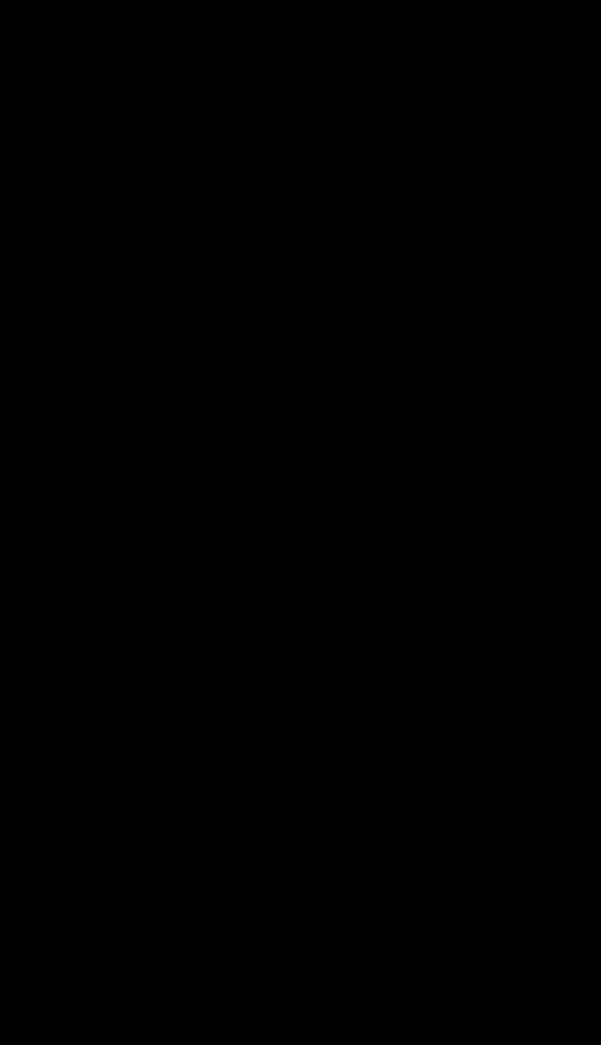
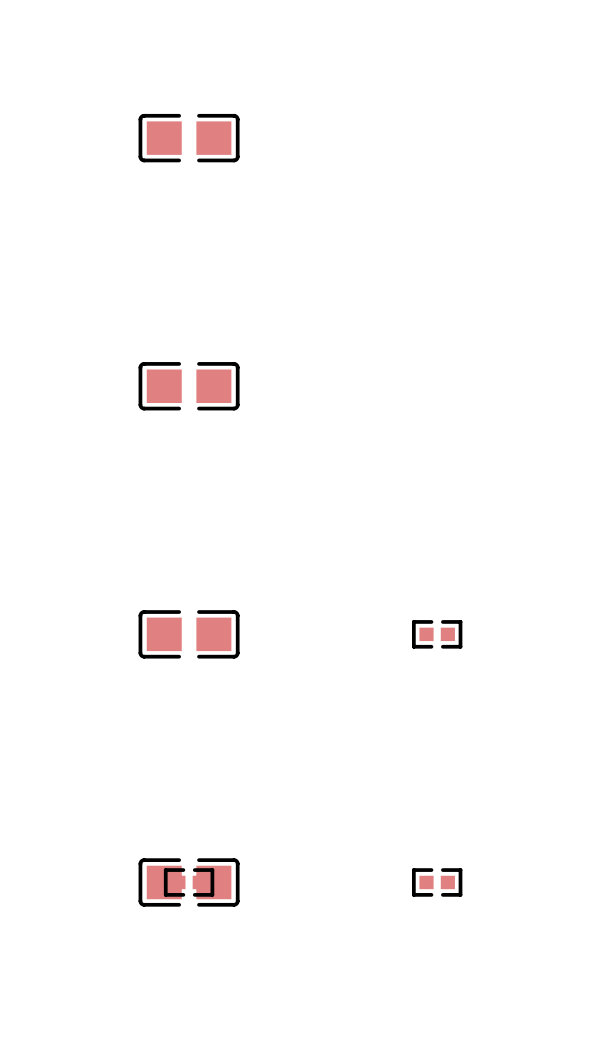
part: none -> (189, 138)
part: none -> (189, 386)
part: none -> (189, 634)
part: none -> (437, 634)
part: none -> (189, 882)
part: none -> (189, 882)
part: none -> (437, 882)

